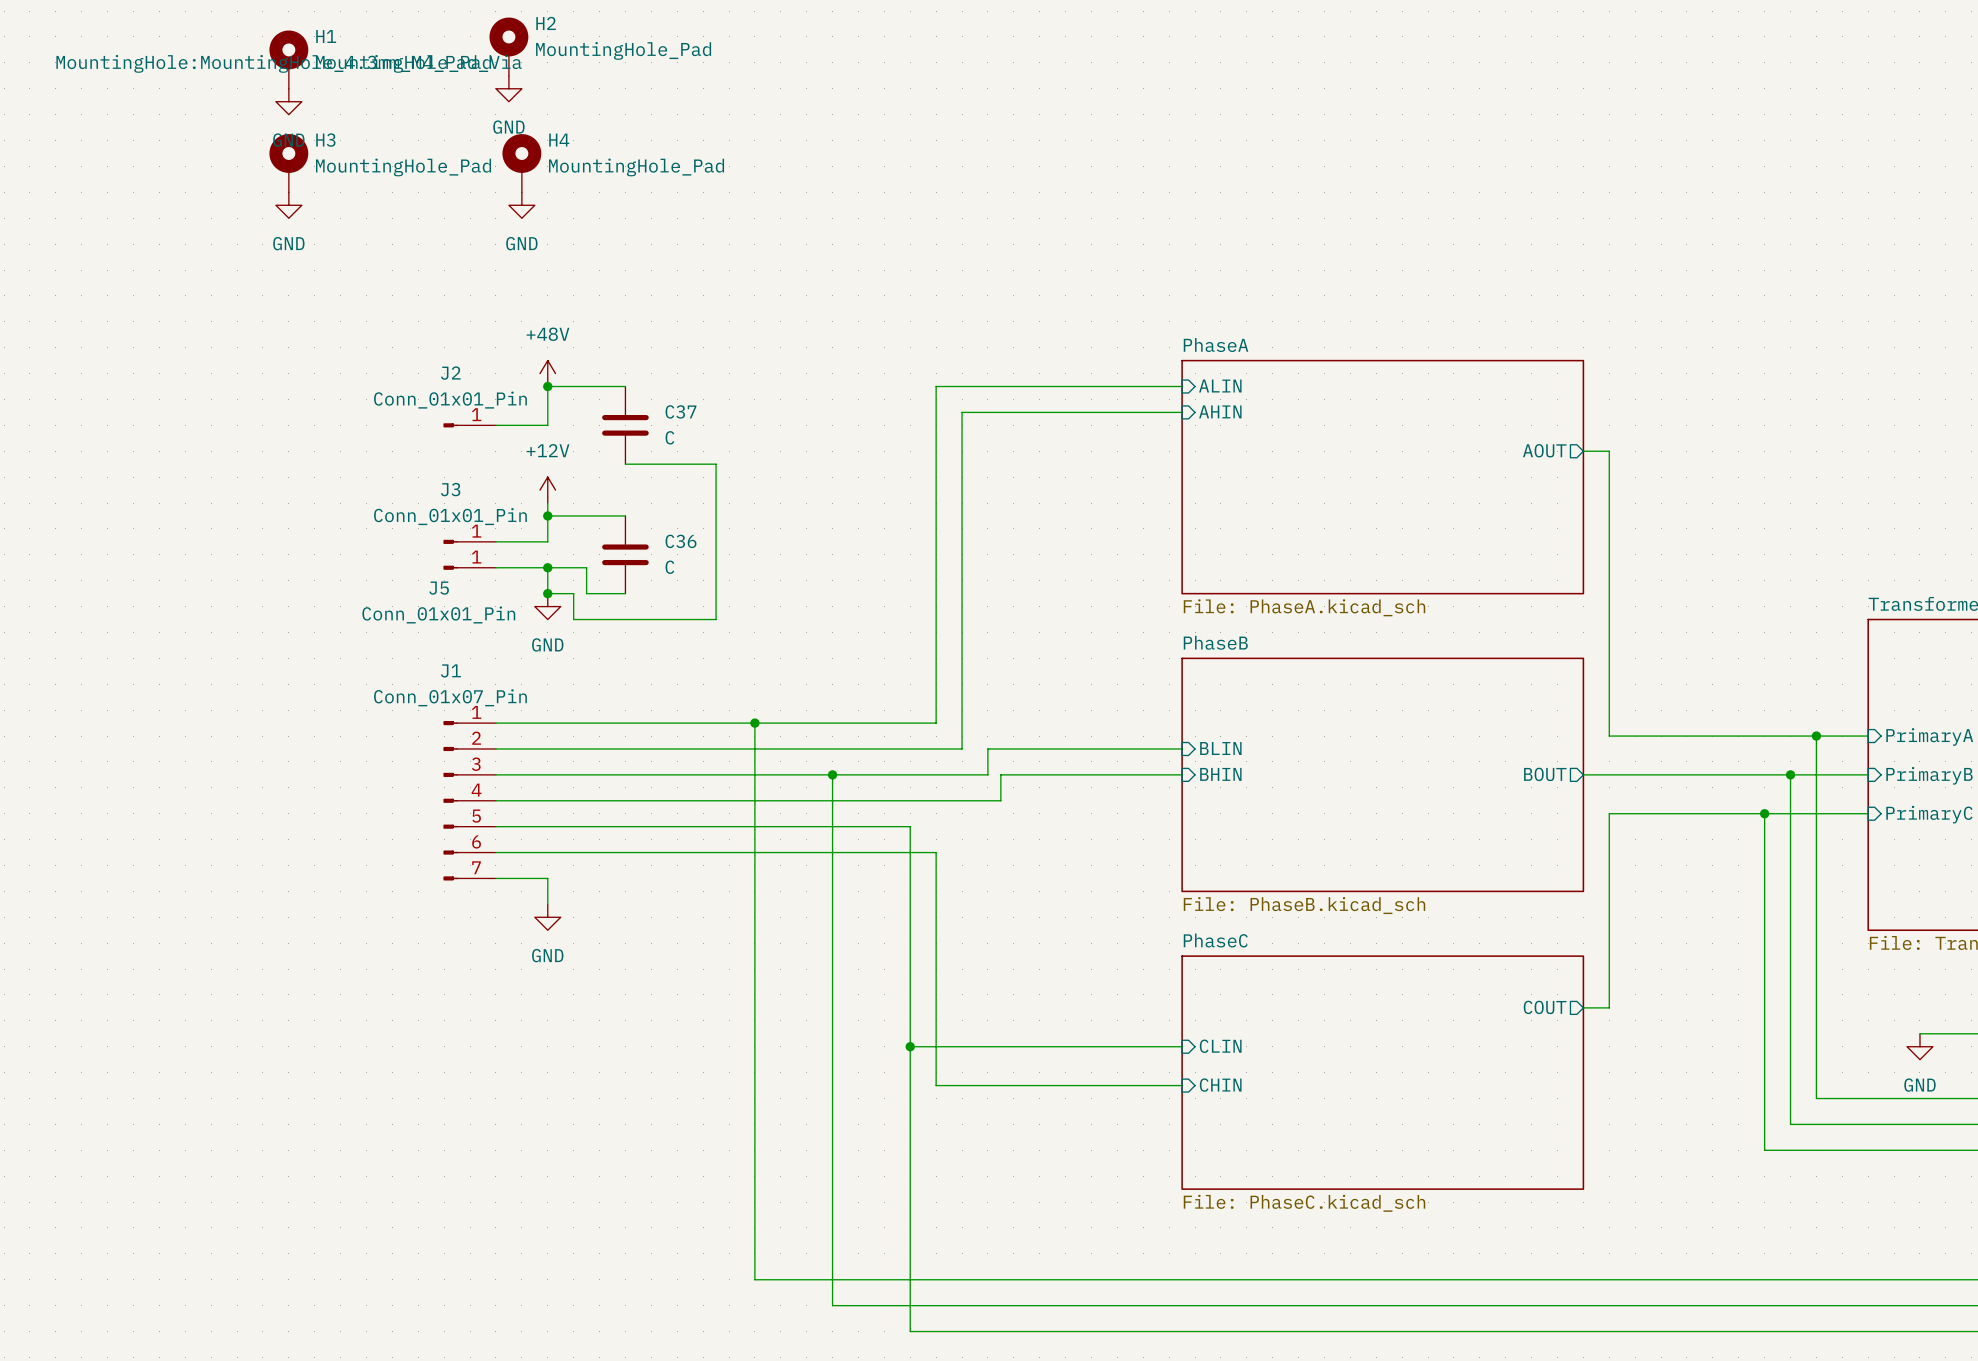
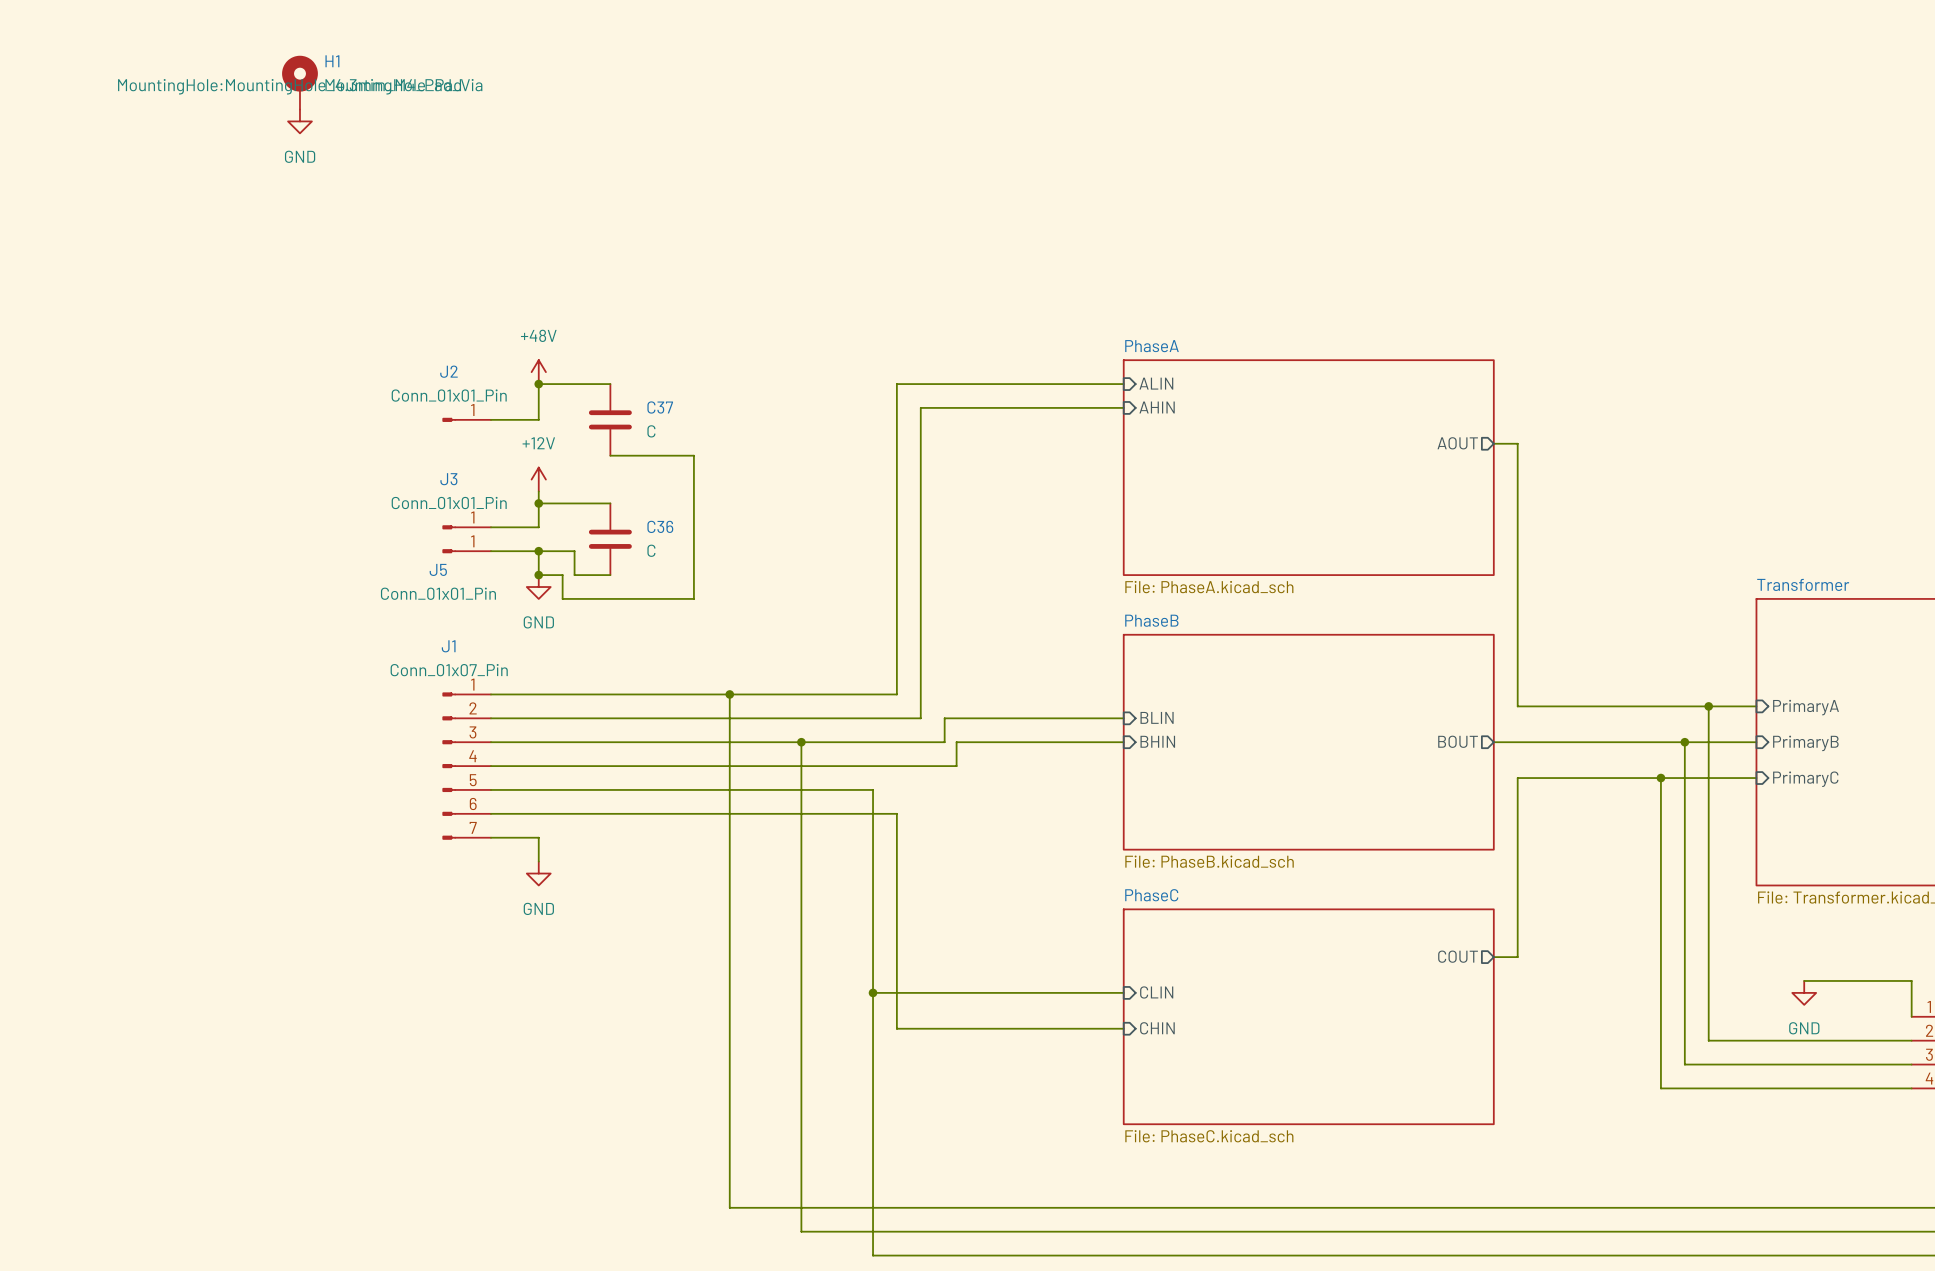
H2: MountingHole_Pad (508, 46) -> none
power symbol: GND (508, 88) -> none
H3: MountingHole_Pad (288, 163) -> none
H4: MountingHole_Pad (521, 163) -> none
power symbol: GND (288, 205) -> none
power symbol: GND (521, 205) -> none

